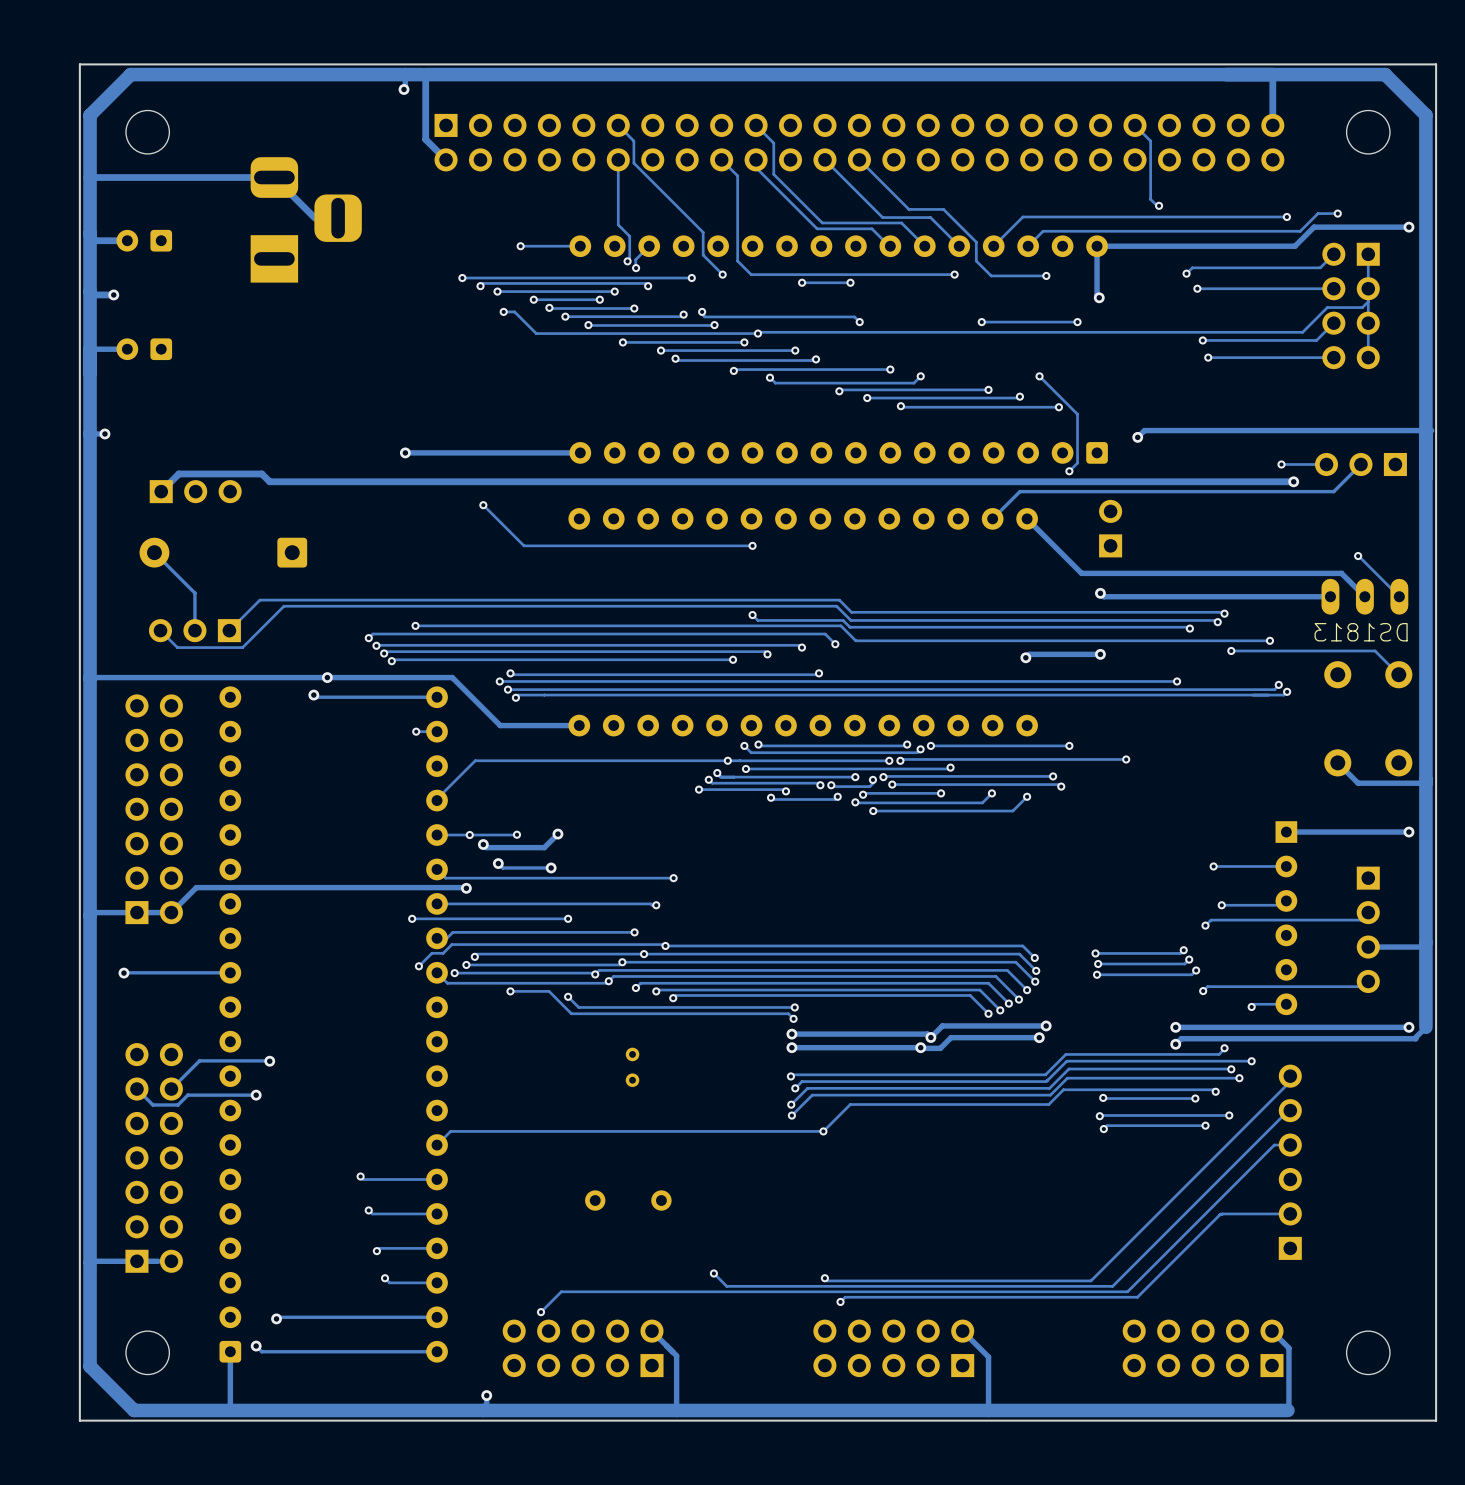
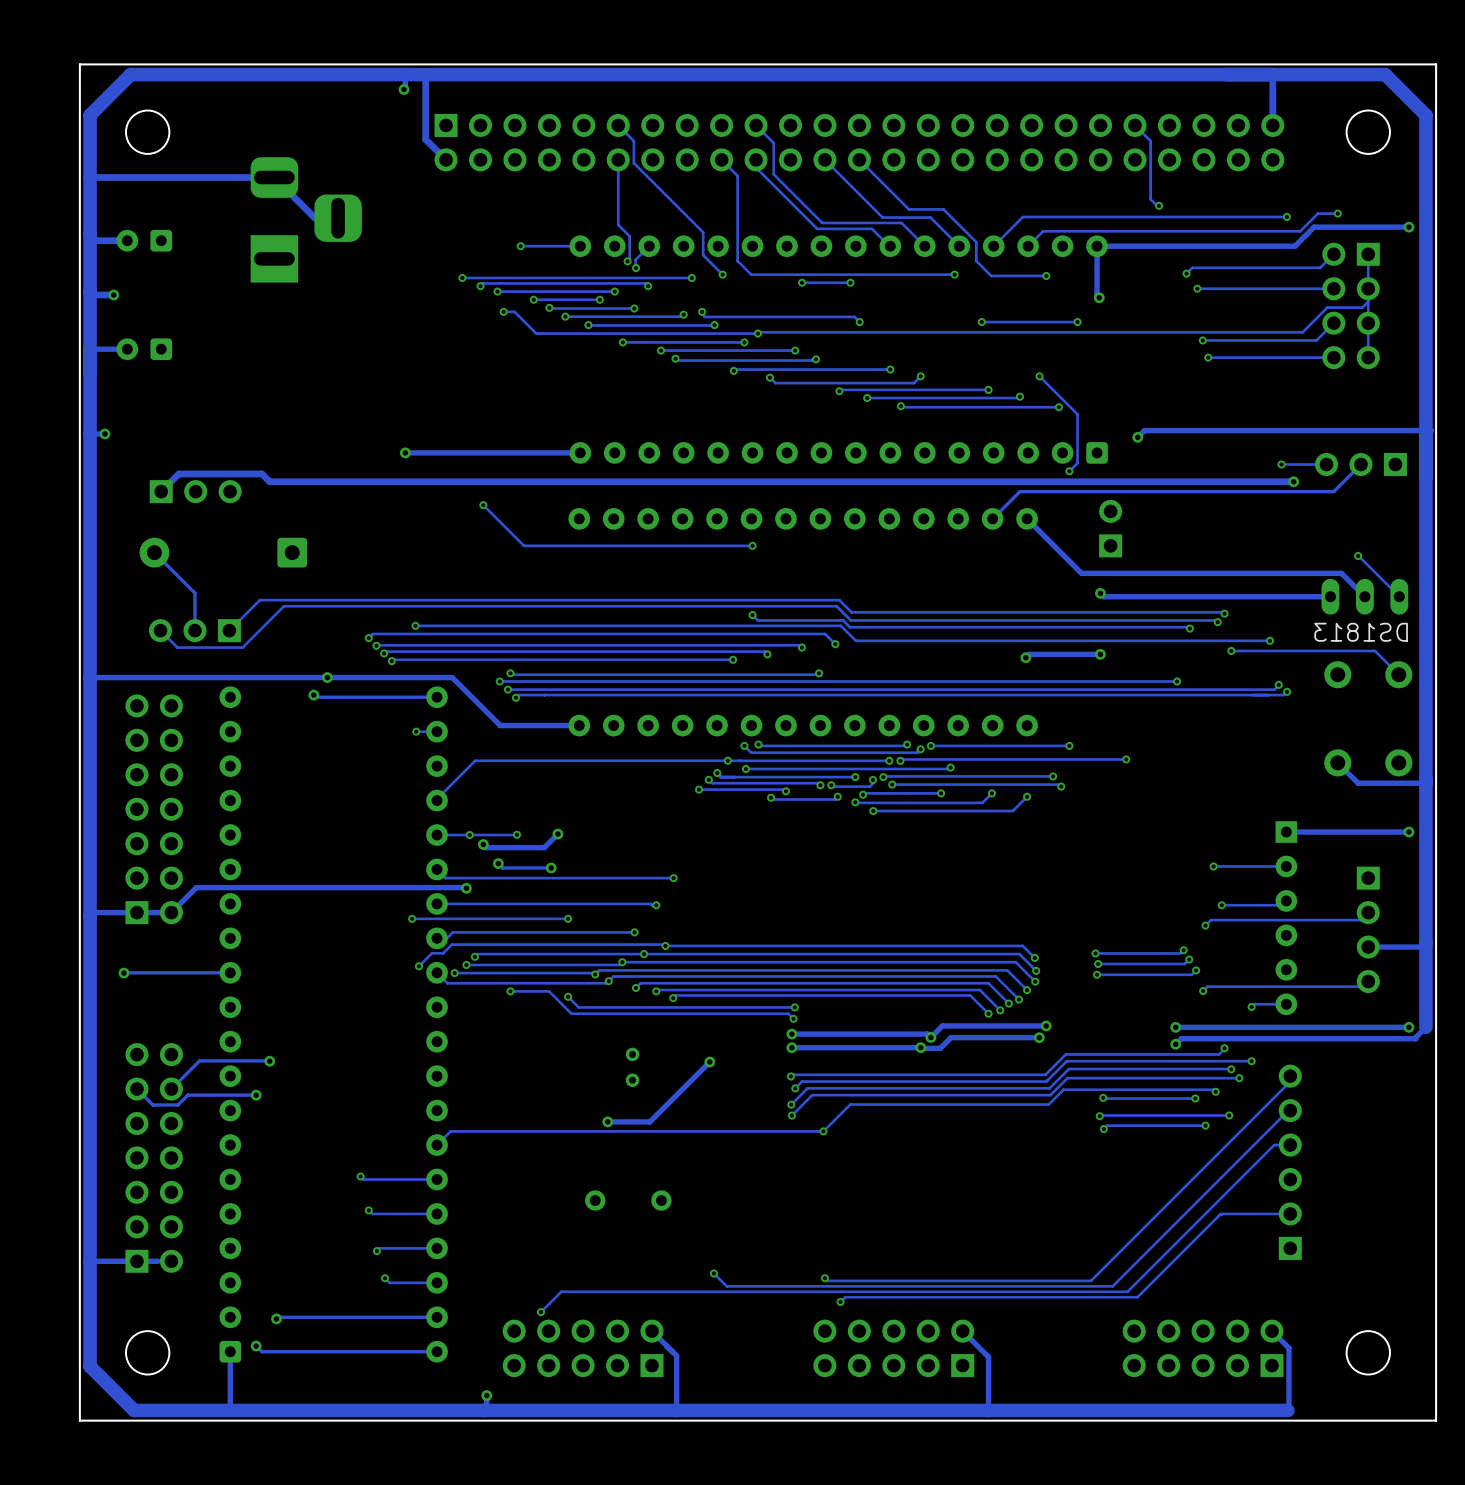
track: none -> (709, 1061) (649, 1121) (607, 1121)
via: none -> (709, 1061)
via: none -> (607, 1121)

